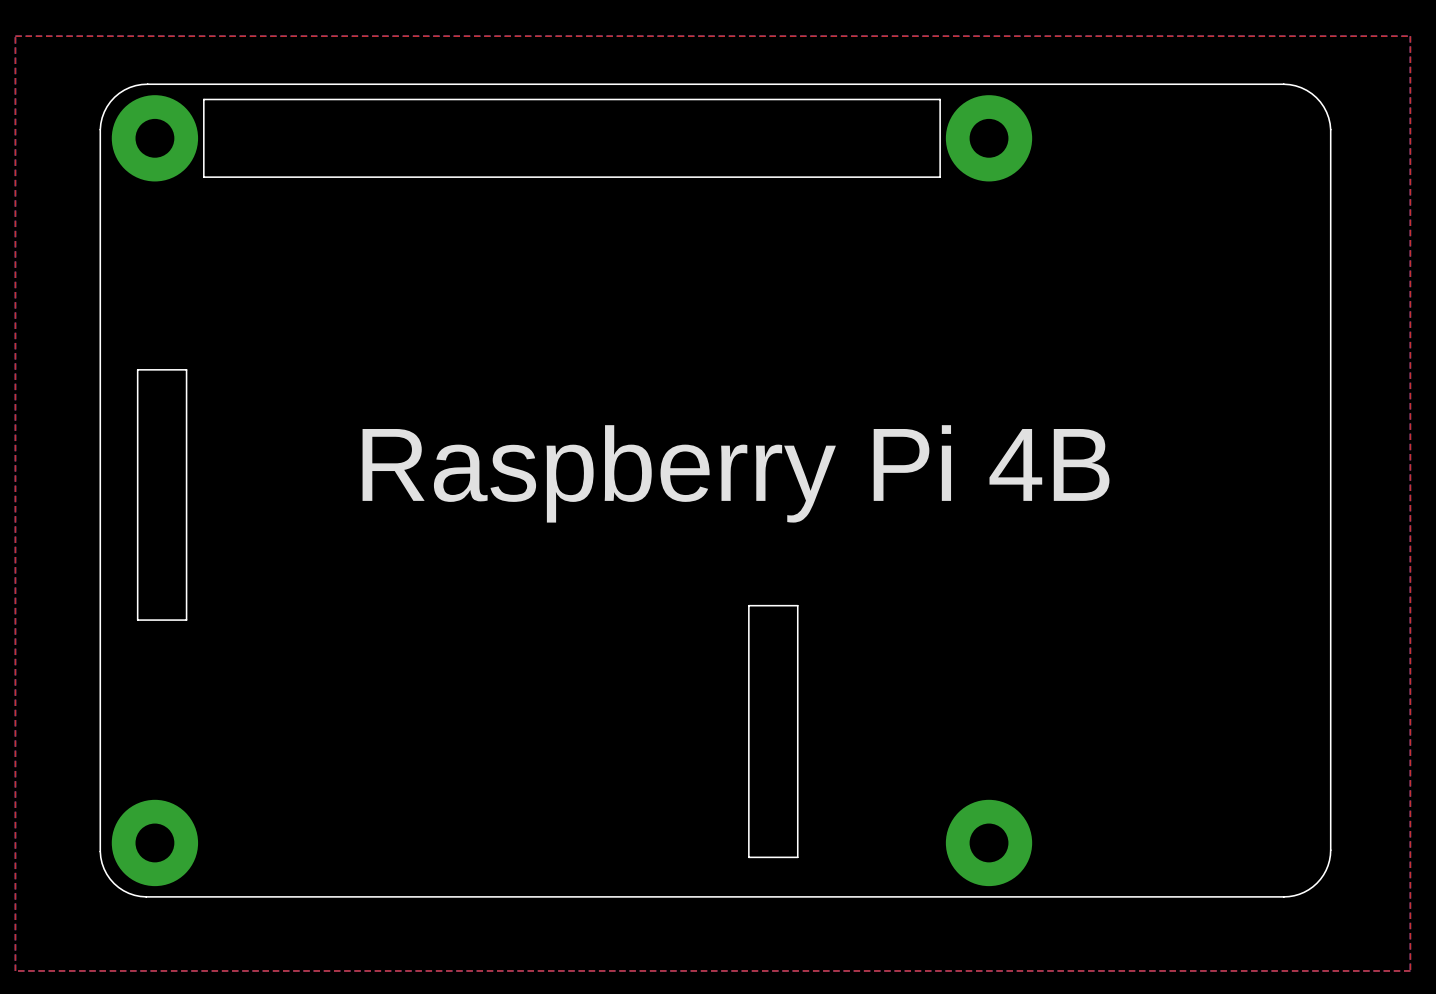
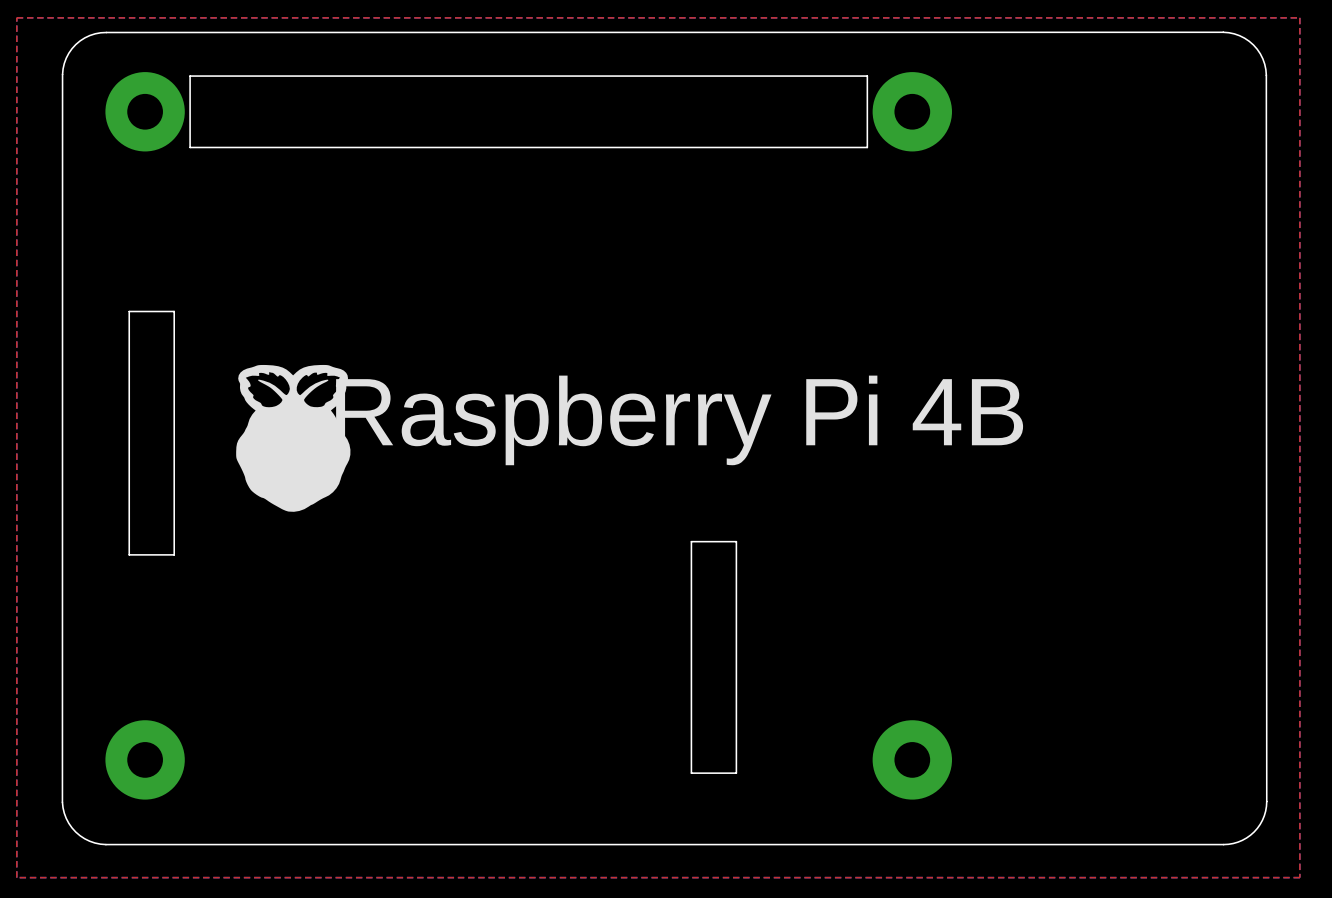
board edge: (147, 84) (1283, 84) (1301, 87) (1311, 93) (1323, 106) (1328, 117) (1330, 129) (1330, 850) (1329, 860) (1323, 875) (1308, 889) (1299, 894) (1283, 896) (146, 896) (128, 893) (118, 887) (106, 874) (102, 863) (100, 851) (100, 129) (104, 112) (114, 97) (129, 87) (147, 84) -> (1223, 32) (106, 32) (95, 33) (80, 40) (66, 58) (62, 74) (62, 802) (68, 823) (84, 838) (105, 844) (1223, 844) (1233, 843) (1246, 838) (1260, 824) (1264, 815) (1266, 801) (1266, 75) (1262, 58) (1253, 45) (1239, 35) (1223, 32)
board edge: (137, 369) (186, 369) -> (129, 324) (129, 311) (174, 311) (174, 324)
part: none -> (293, 438)

